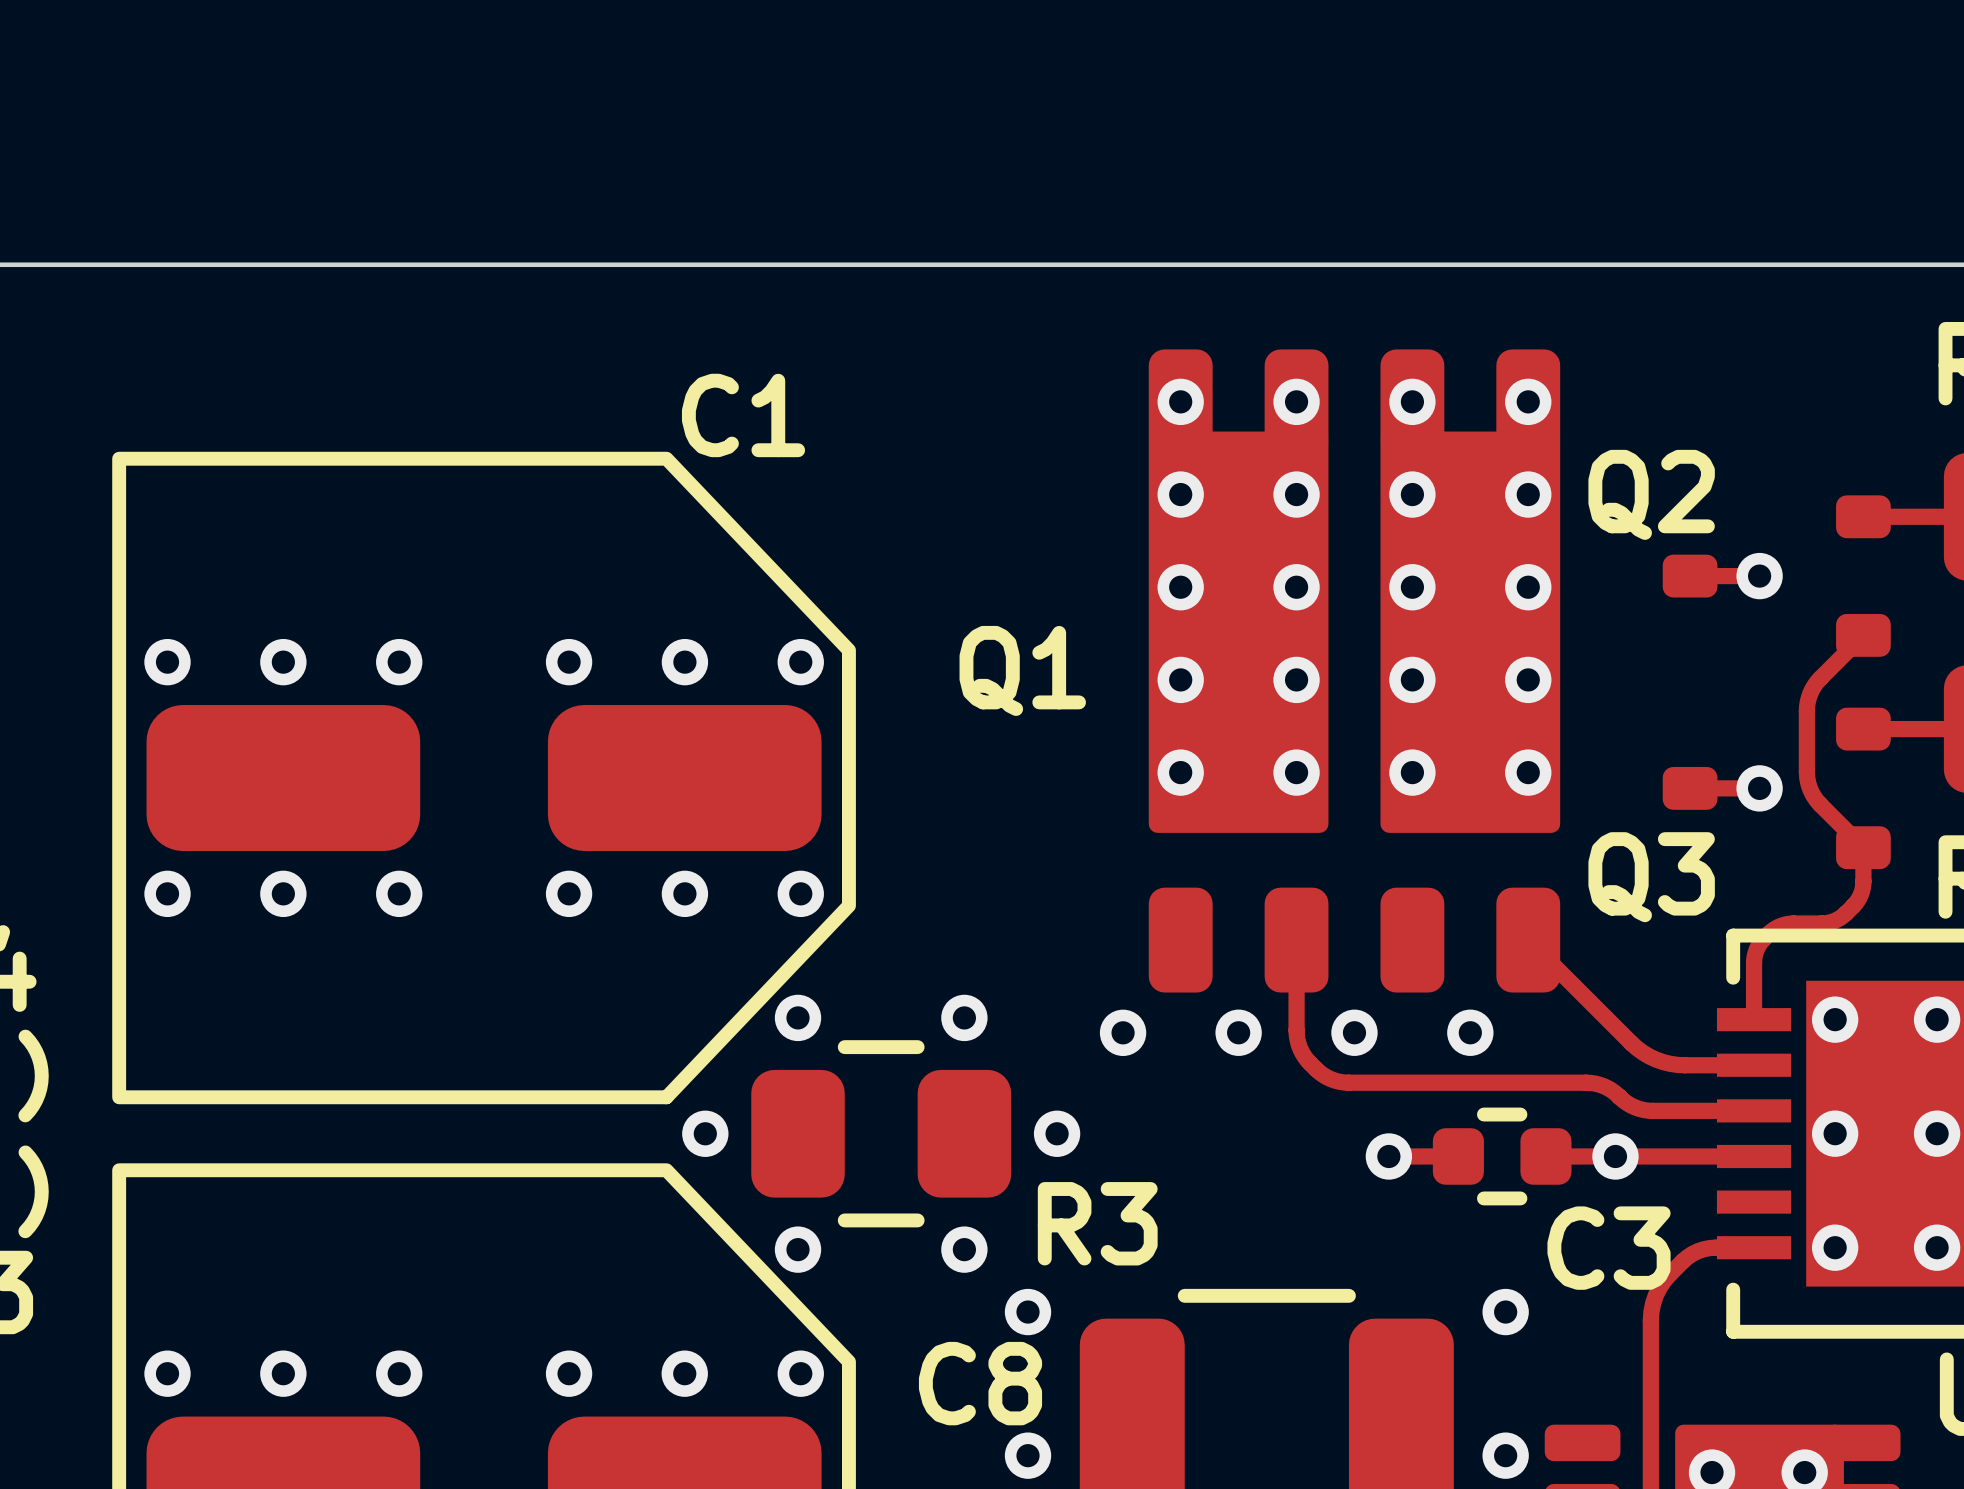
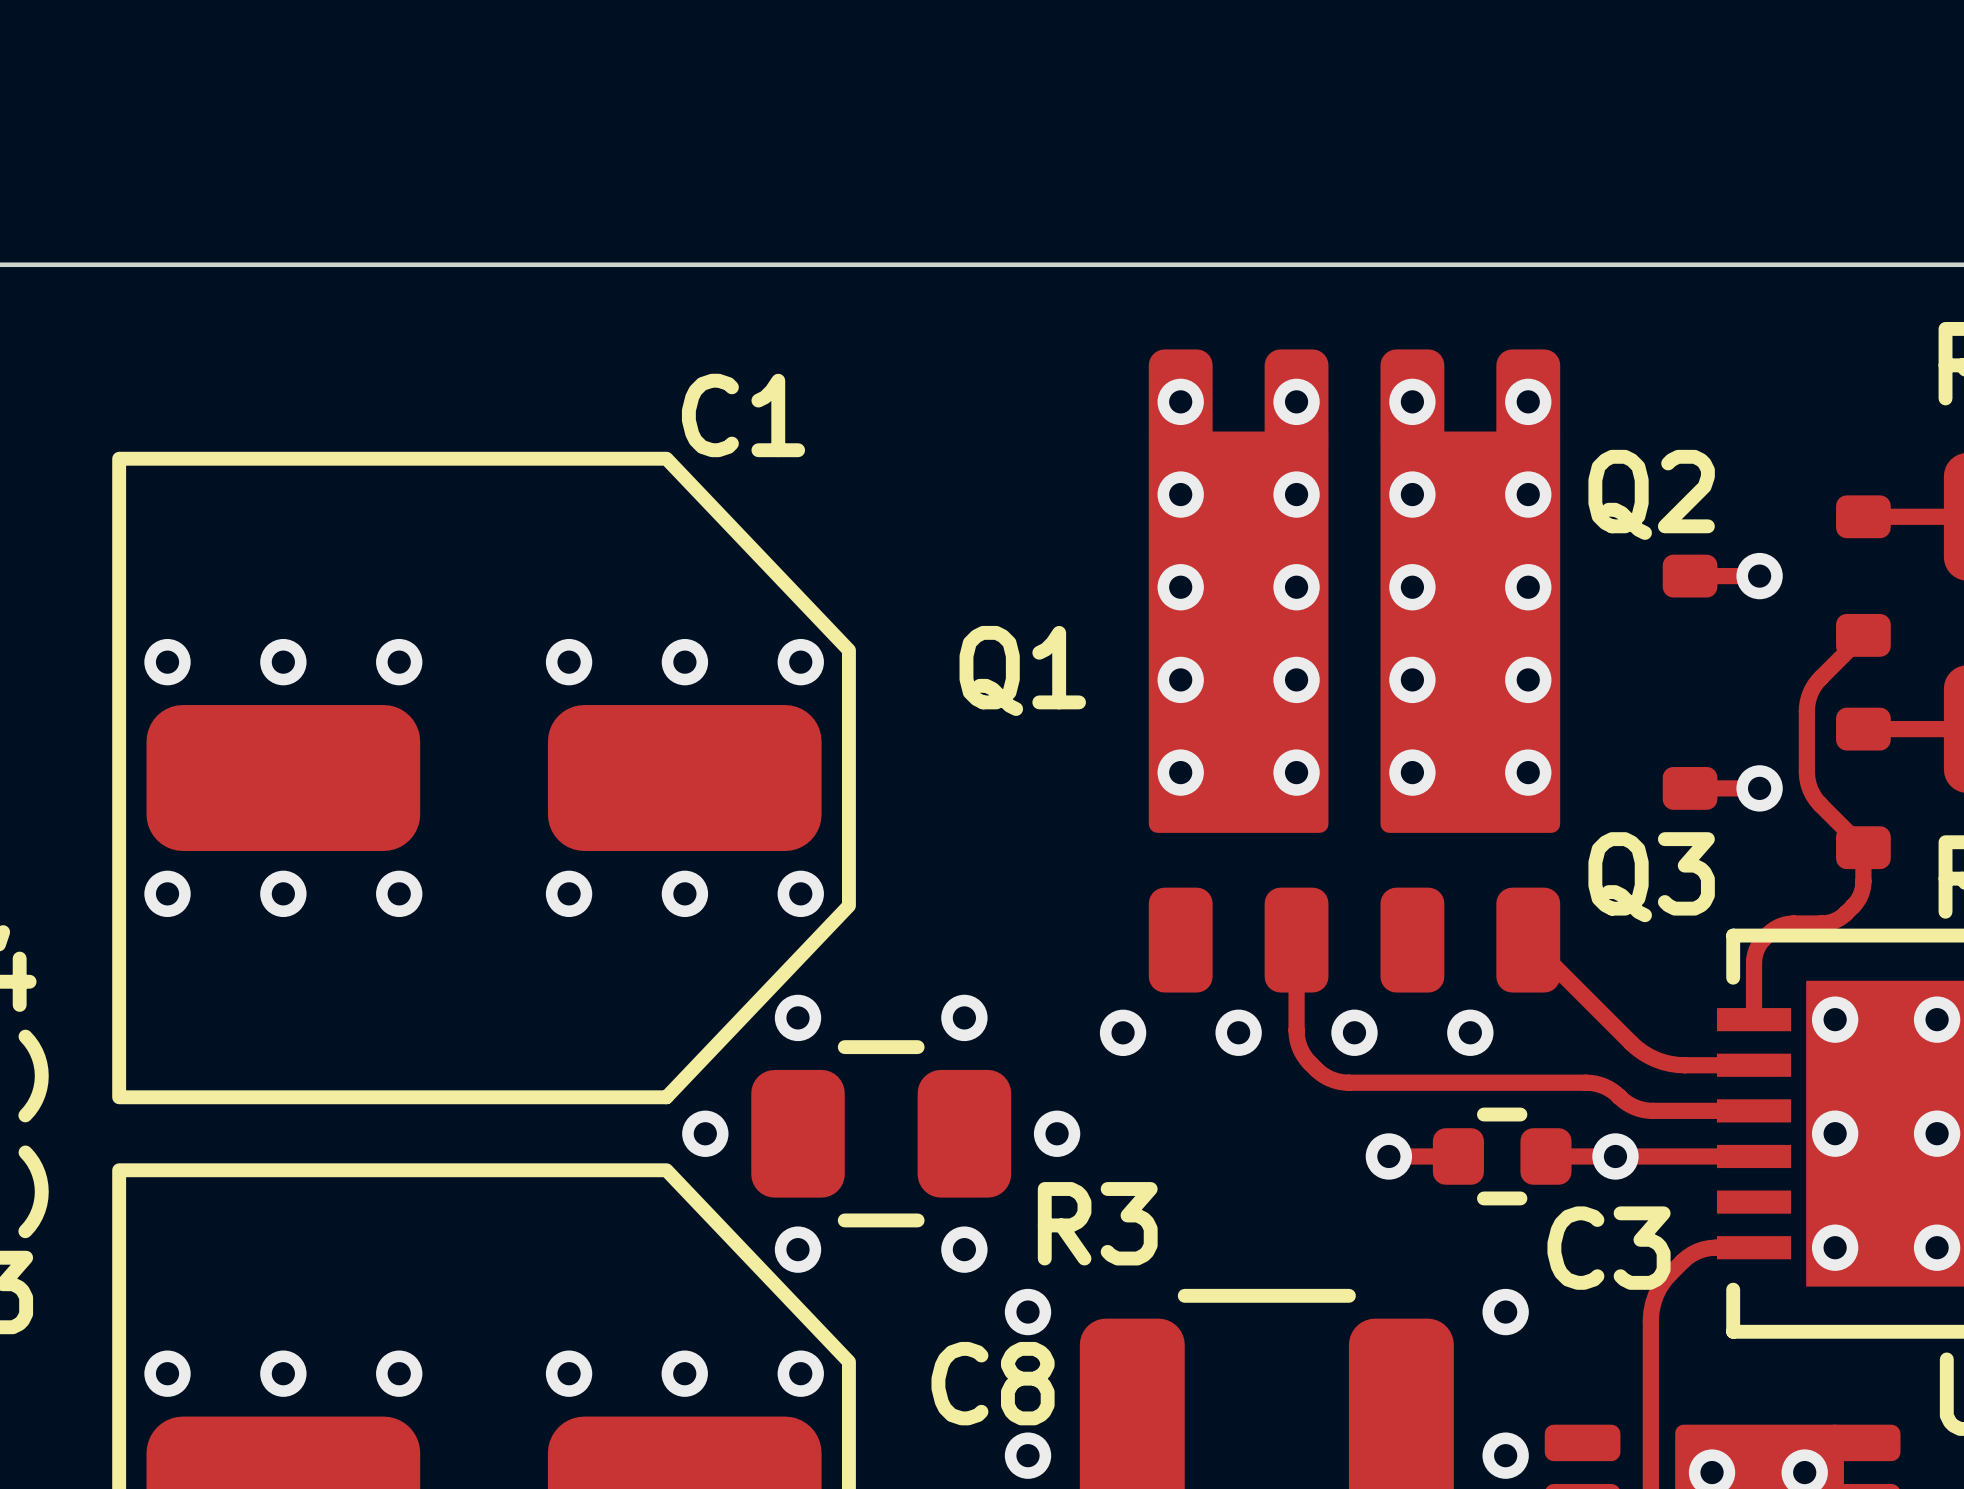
C8 name position: C8 (980, 1383) -> C8 (993, 1383)

